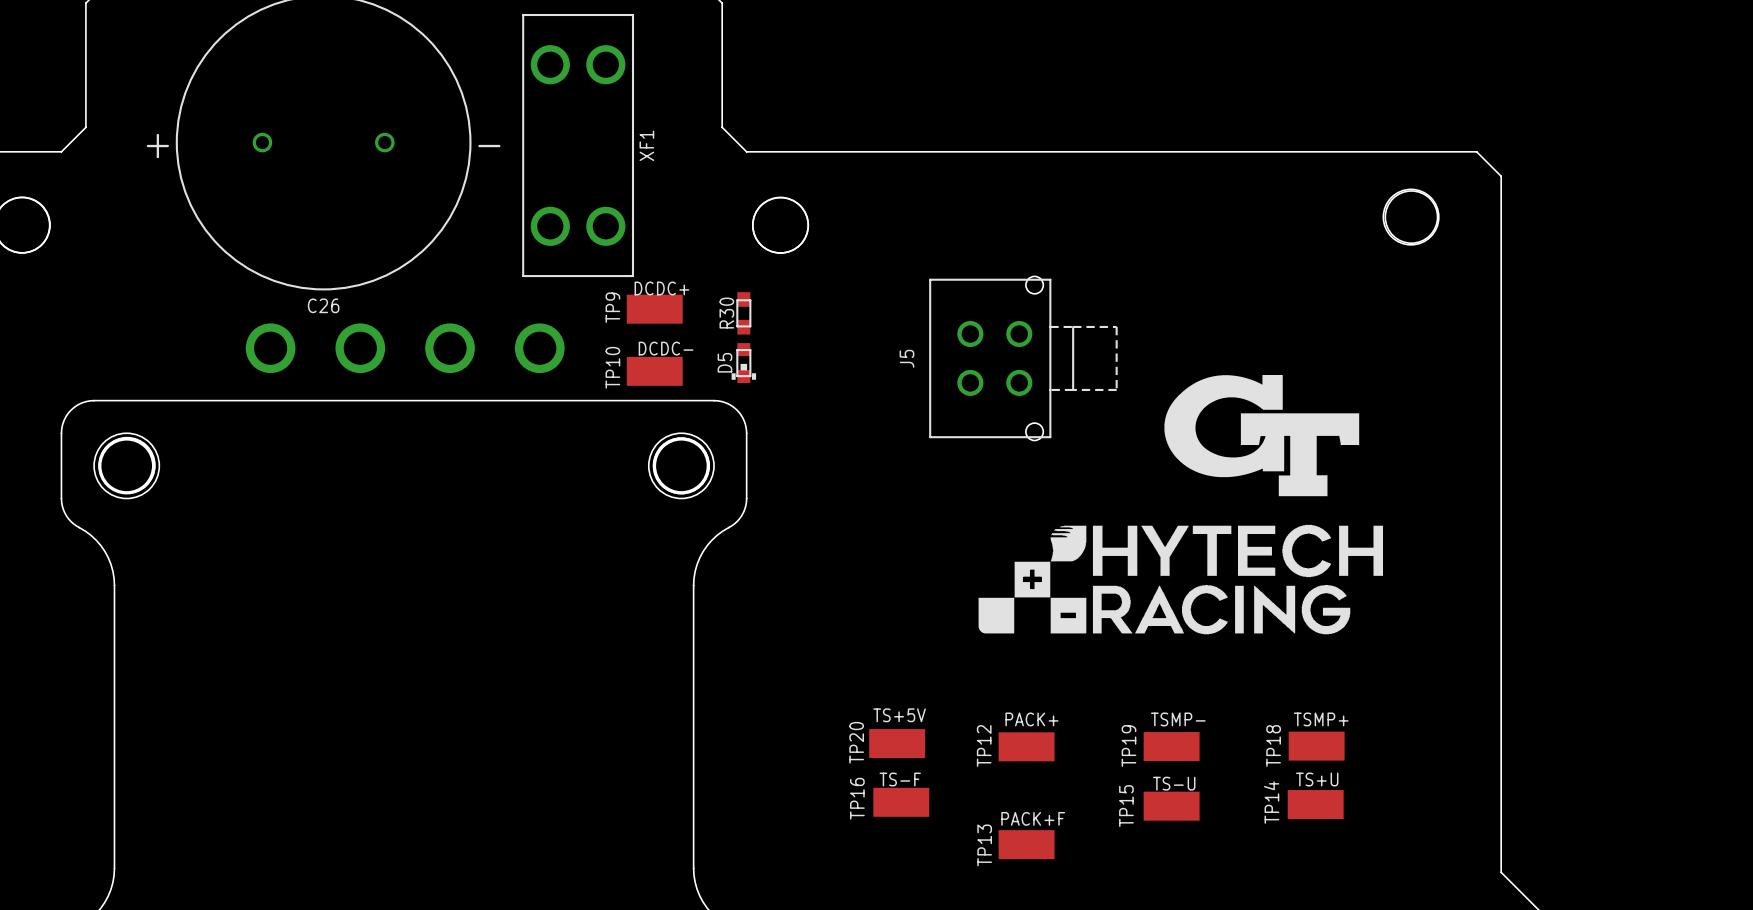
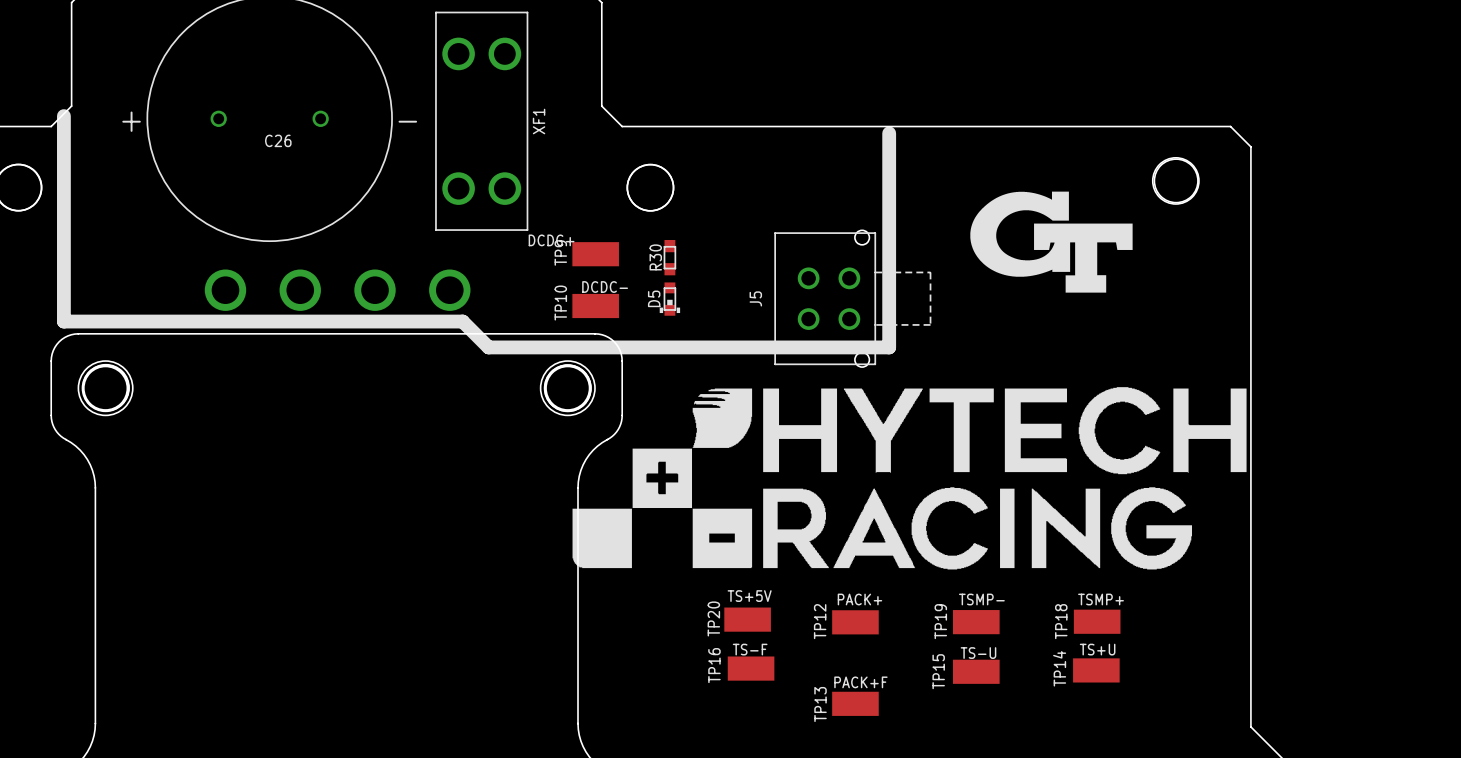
line: none -> (63, 116) (63, 321) (462, 321) (488, 347) (889, 347) (889, 133)
C26 name position: C26 (323, 305) -> C26 (278, 140)
TP9 position: (654, 309) -> (595, 254)
R30 position: (743, 313) -> (669, 257)
text position: DCDC- (666, 348) -> DCDC- (605, 287)
D5 position: (743, 363) -> (669, 299)
TP10 position: (654, 371) -> (595, 306)
drawing position: (1261, 435) -> (1051, 242)
drawing: none -> [572, 387, 1247, 570]
drawing: [978, 524, 1384, 635] -> none

